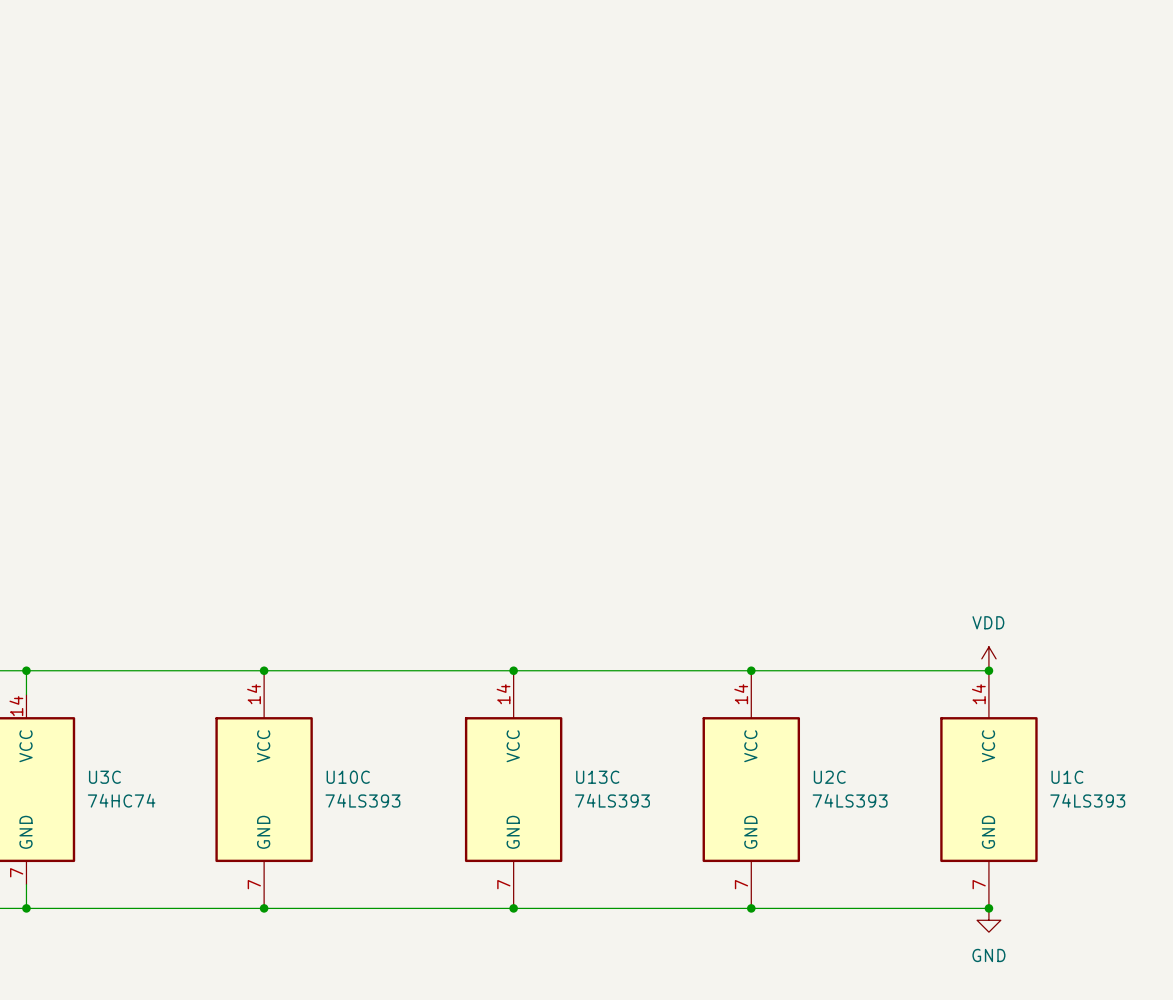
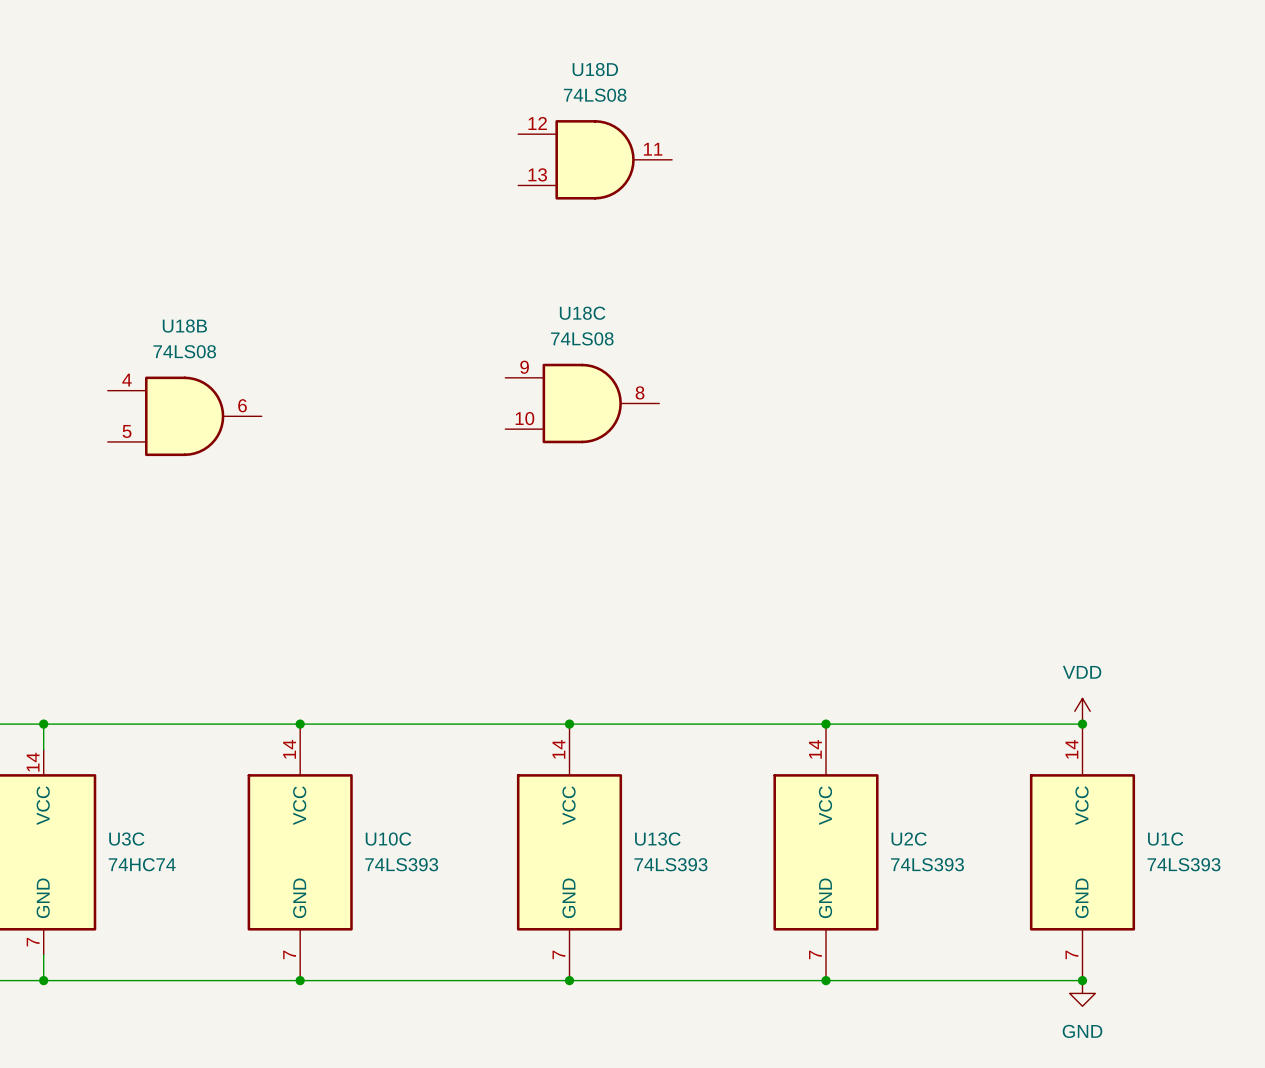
U18D: none -> 74LS08 (595, 159)
U18C: none -> 74LS08 (582, 403)
U18B: none -> 74LS08 (184, 416)

